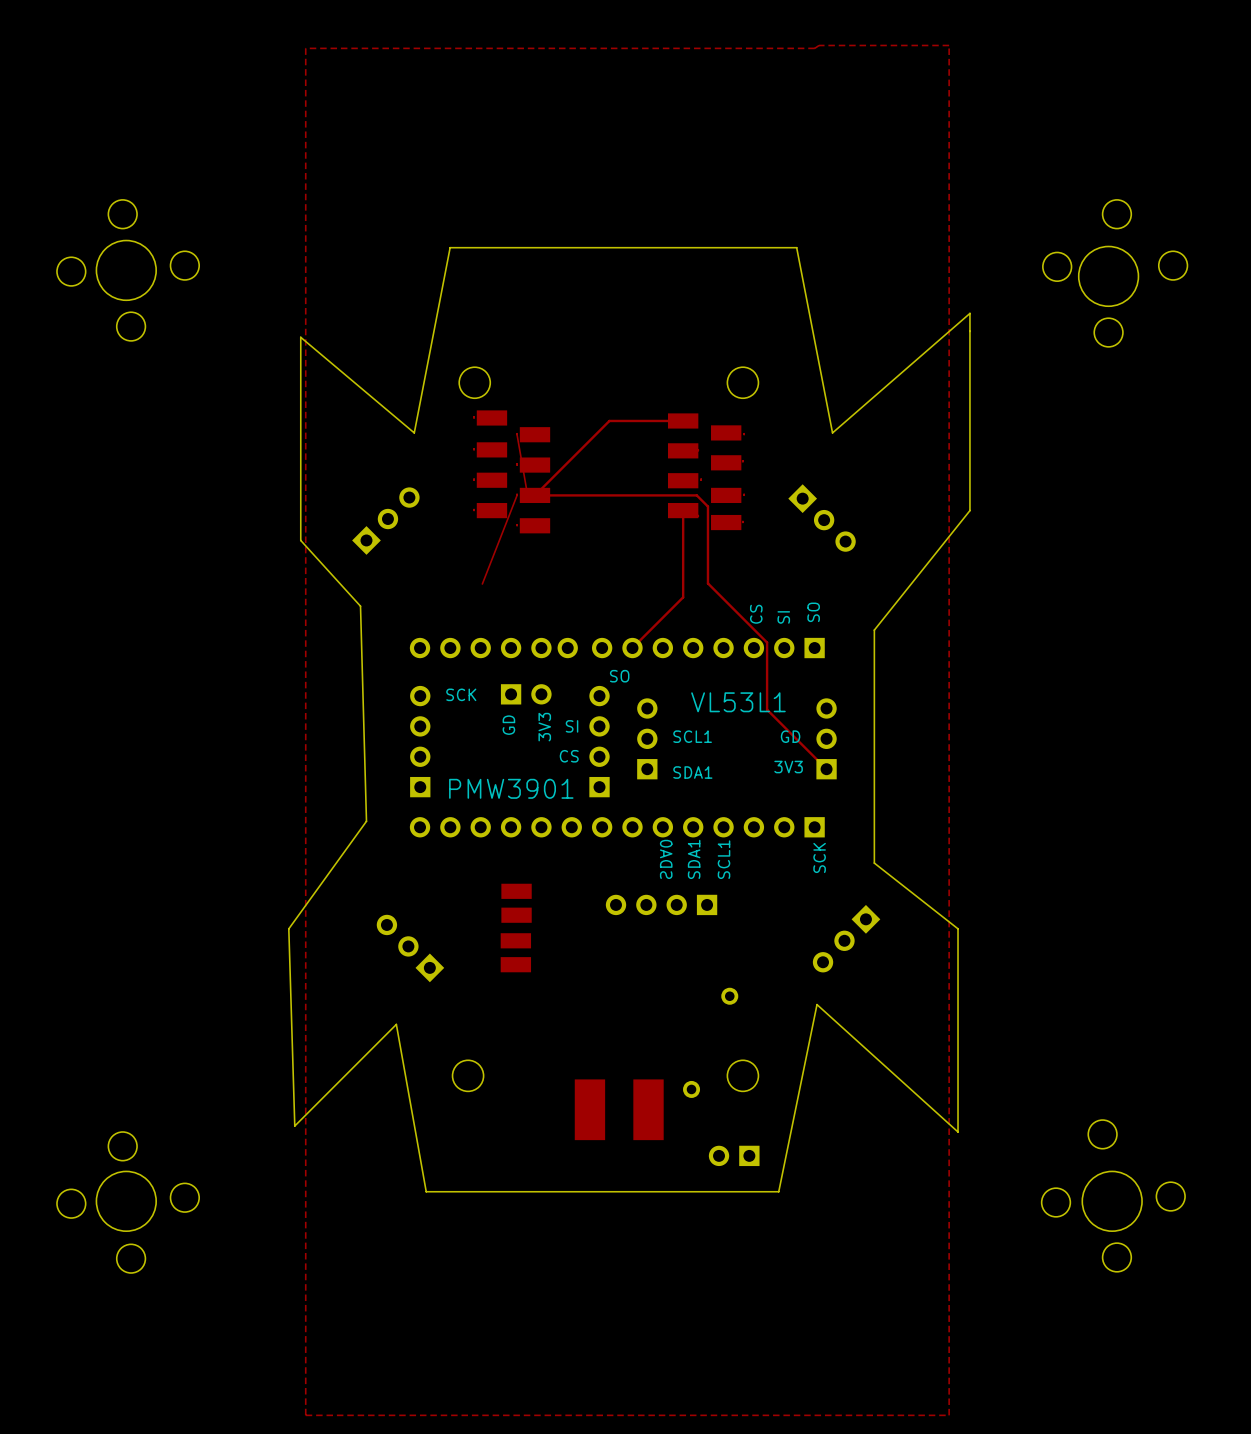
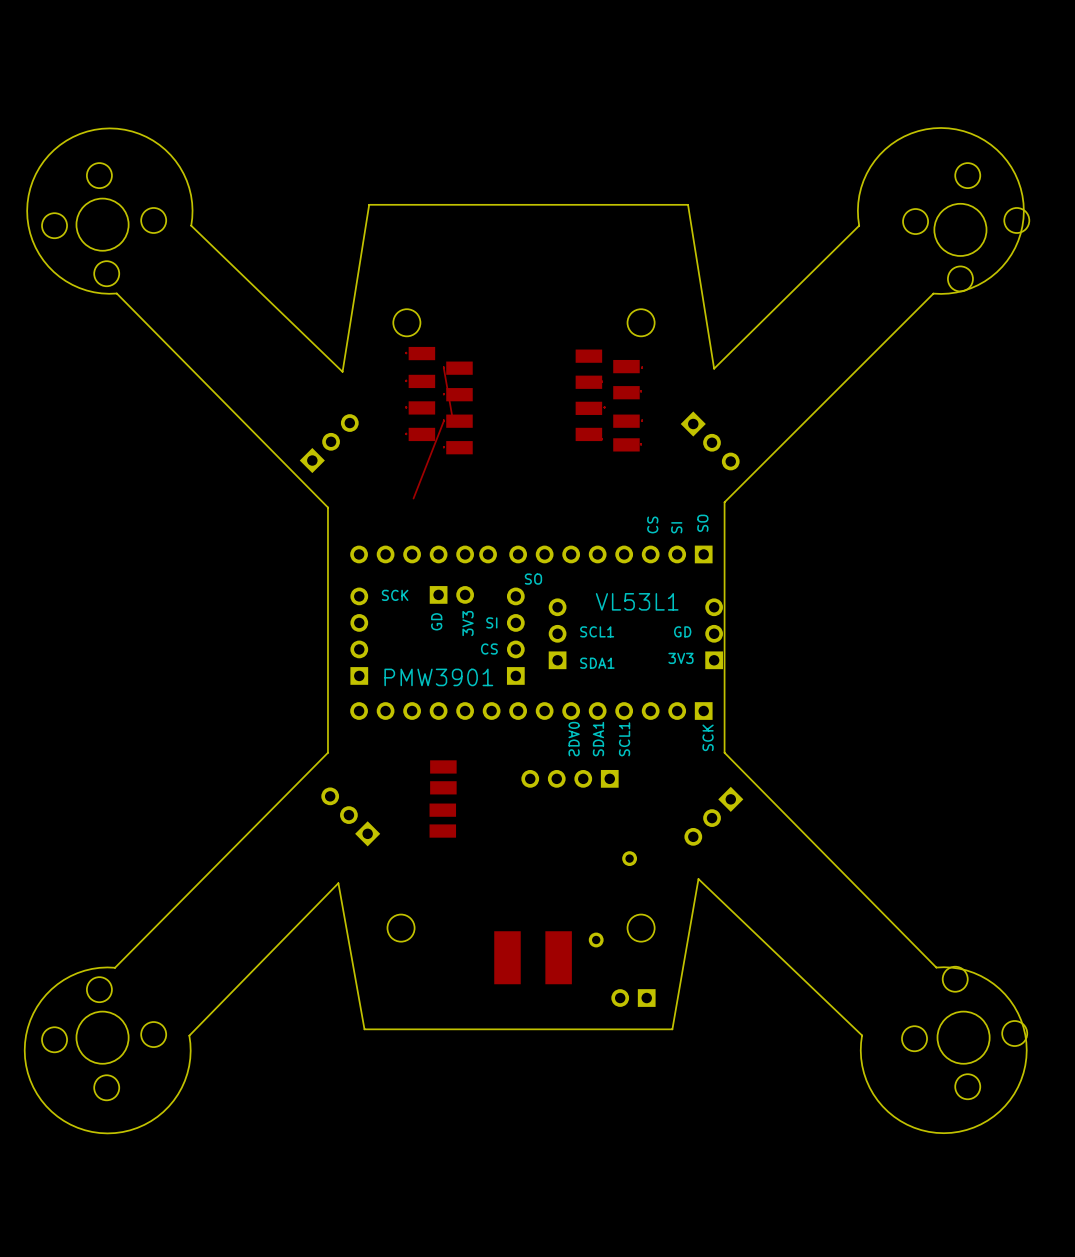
top zone outline: (949, 45) (949, 1415) (305, 1415) (305, 48) (814, 48) (819, 45) (949, 45) -> none
board edge: none -> (933, 293) (724, 502) (724, 752) (936, 967) (951, 967) (973, 972) (993, 984) (1005, 994) (1018, 1013) (1025, 1035) (1026, 1057) (1021, 1080) (1005, 1106) (993, 1116) (973, 1127) (959, 1131) (936, 1132) (921, 1130) (900, 1120) (877, 1100) (866, 1080) (861, 1058) (862, 1035) (698, 879) (672, 1029)
top track: (683, 420) (609, 420) (534, 495) (696, 495) (707, 506) (707, 583) (767, 642) (767, 709) (826, 769) -> none
top track: (683, 510) (683, 597) (632, 648) -> none
part position: (846, 938) -> (713, 816)
board edge: (396, 1024) (294, 1126) (288, 928) (366, 821) (360, 606) (300, 540) (300, 337) (414, 432) (450, 247) (796, 247) (832, 432) (969, 313) (969, 510) (874, 630) (874, 863) (958, 928) (958, 1131) (817, 1004) (778, 1191) -> (338, 883) (189, 1035) (190, 1058) (184, 1080) (173, 1100) (157, 1116) (130, 1130) (107, 1133) (92, 1131) (63, 1120) (41, 1100) (30, 1080) (24, 1050) (27, 1027) (41, 1000) (57, 984) (70, 976) (92, 968) (115, 967) (327, 752) (327, 507) (116, 293) (94, 292) (79, 288) (59, 276) (43, 260) (30, 233) (27, 203) (35, 174) (54, 149) (79, 133) (102, 128) (132, 131) (159, 144) (175, 160) (186, 180) (192, 202) (191, 225) (342, 371) (369, 204) (688, 204) (714, 368) (859, 225) (858, 202) (861, 187) (866, 173) (879, 154) (891, 144) (911, 133) (925, 129) (948, 128) (978, 136) (1002, 155) (1015, 174) (1020, 188) (1023, 218) (1020, 233) (1011, 254) (991, 277) (963, 290) (933, 293)

